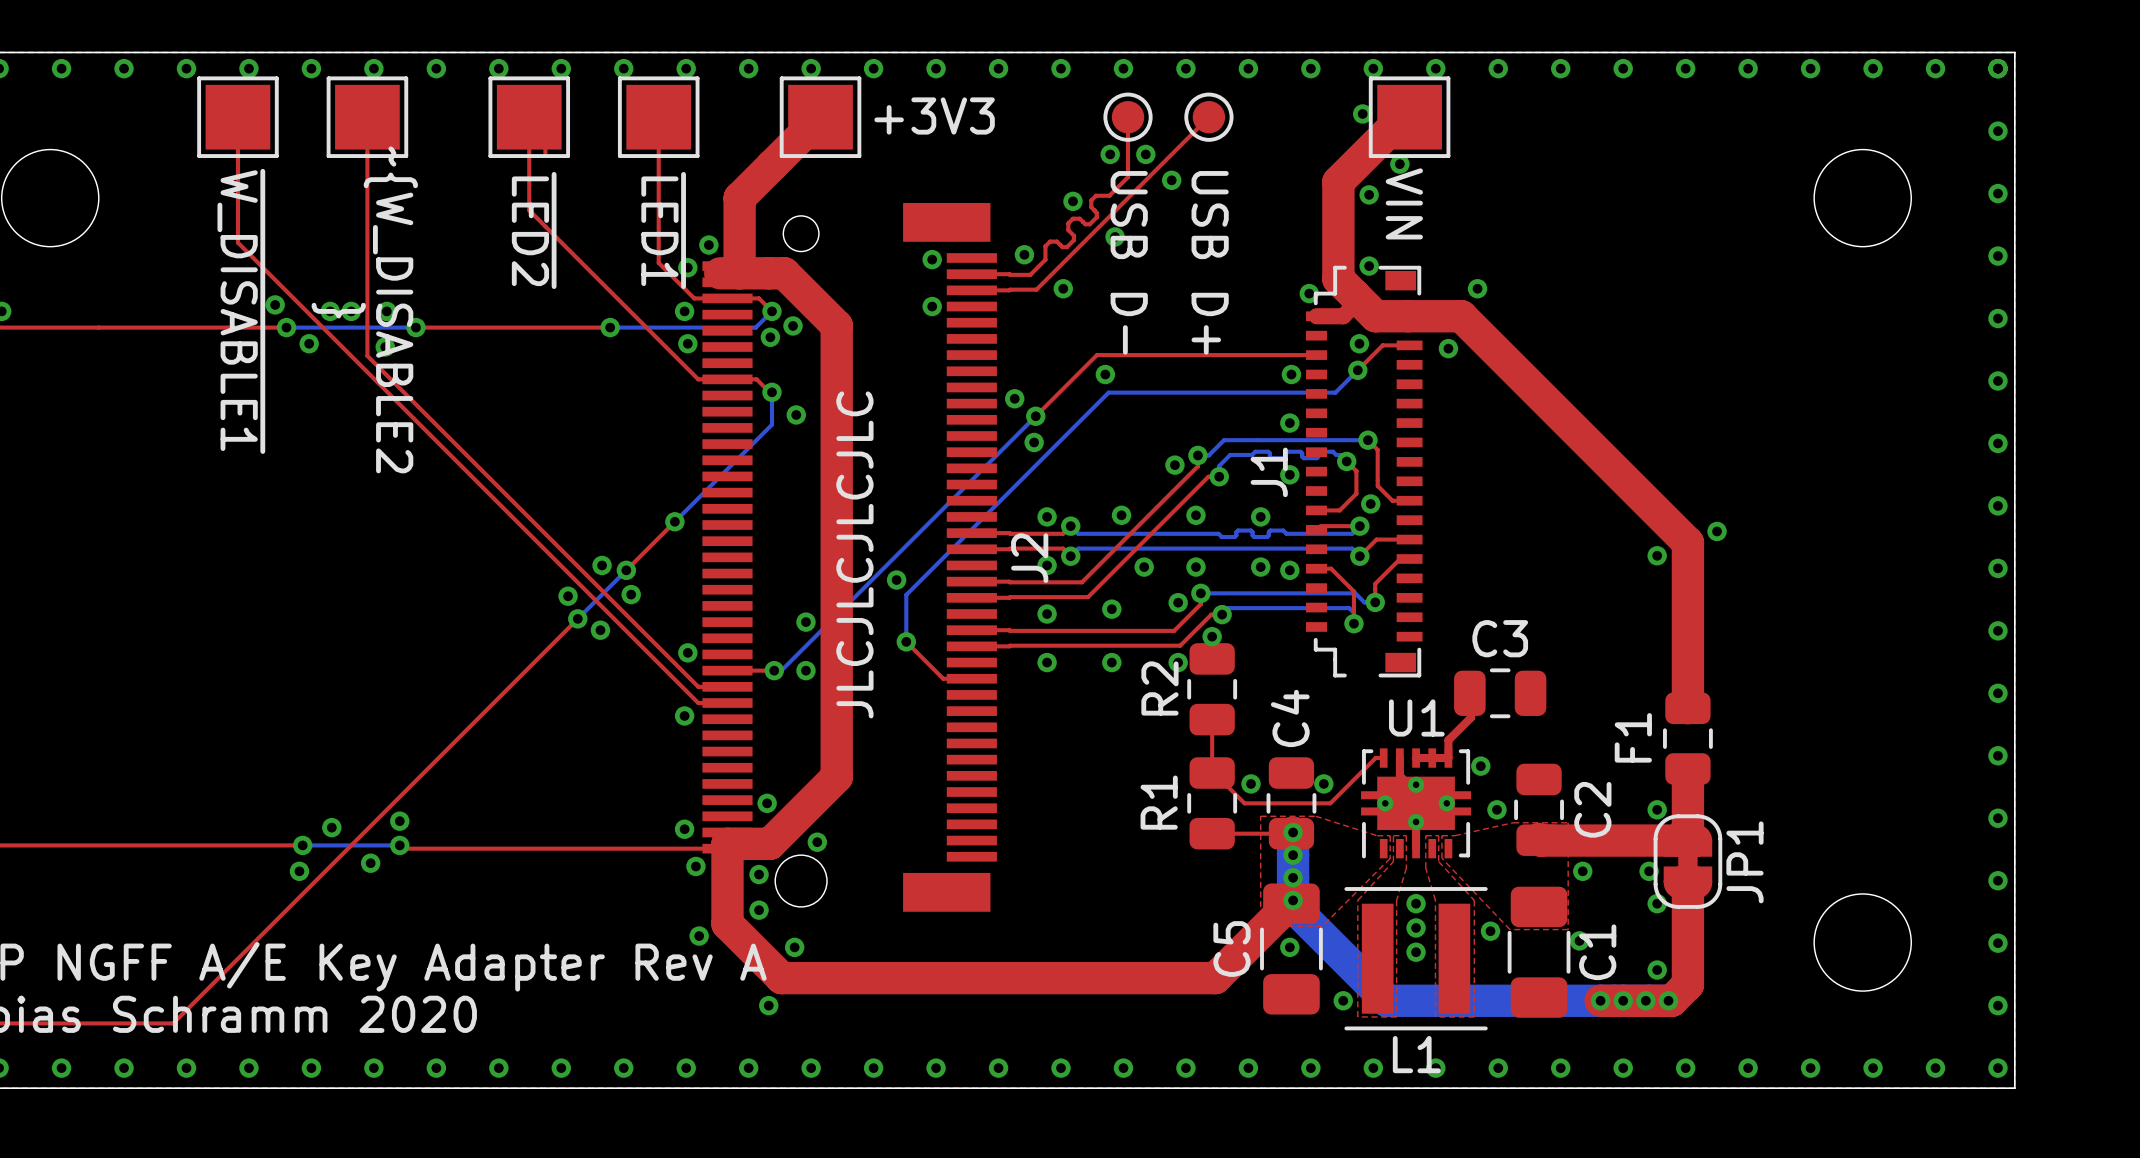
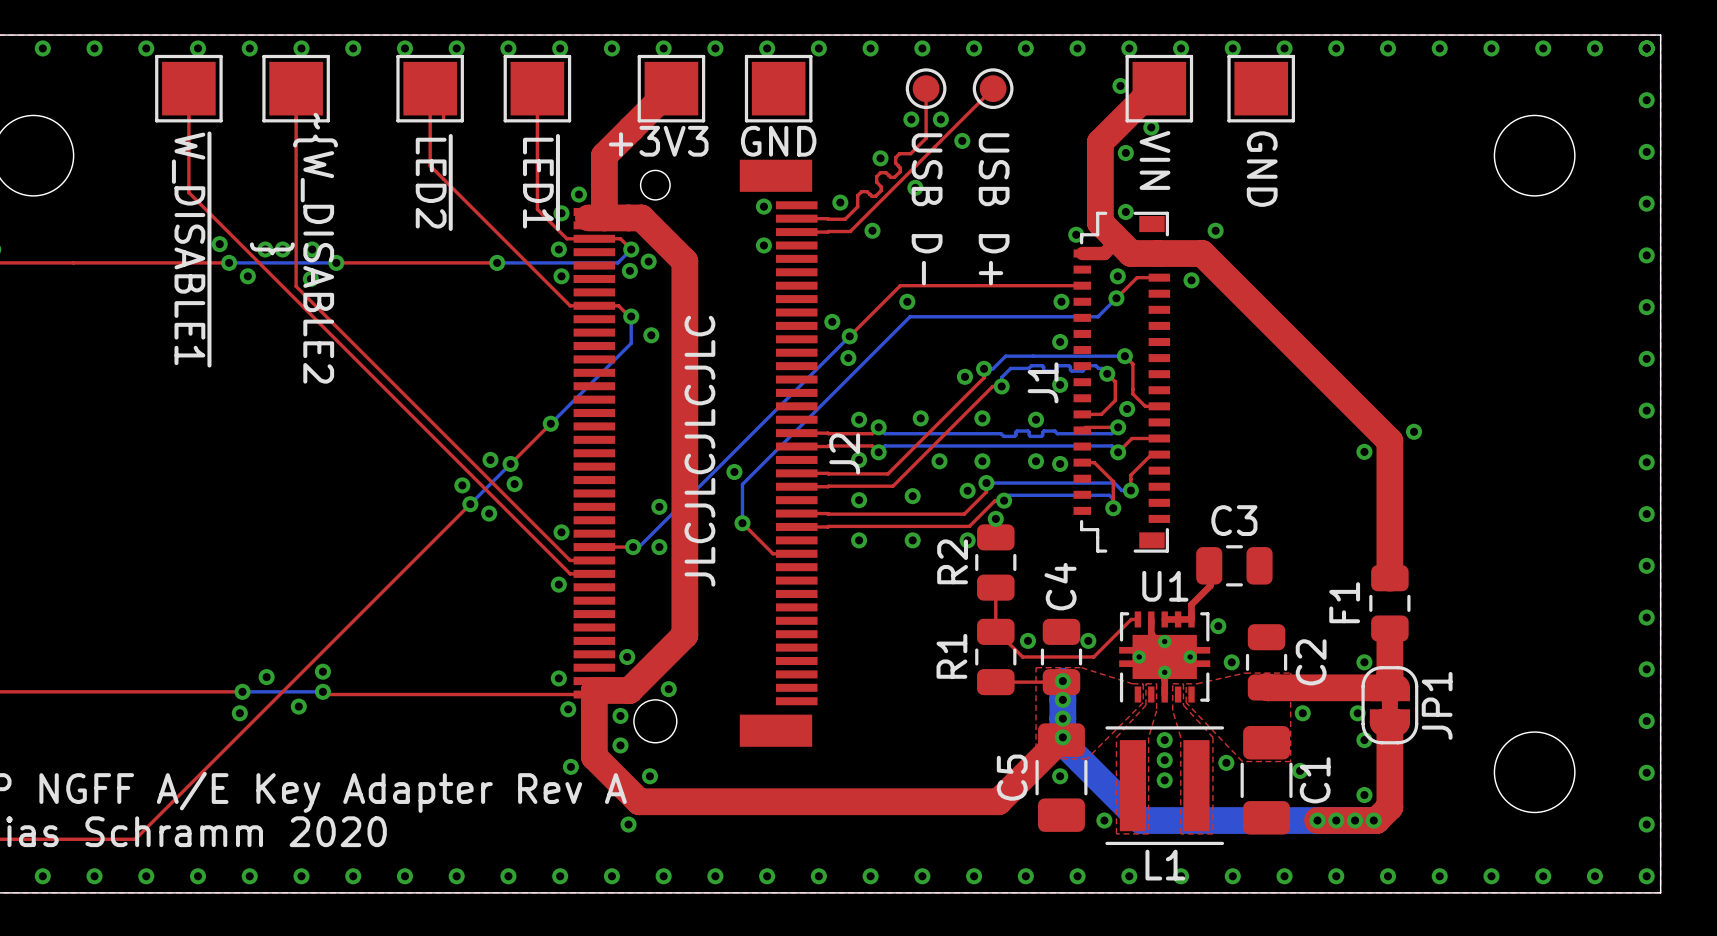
text position: +3V3 (934, 115) -> +3V3 (658, 141)
part: none -> (778, 88)
part: none -> (1261, 88)
text: none -> GND (778, 141)
text: none -> GND (1262, 169)

